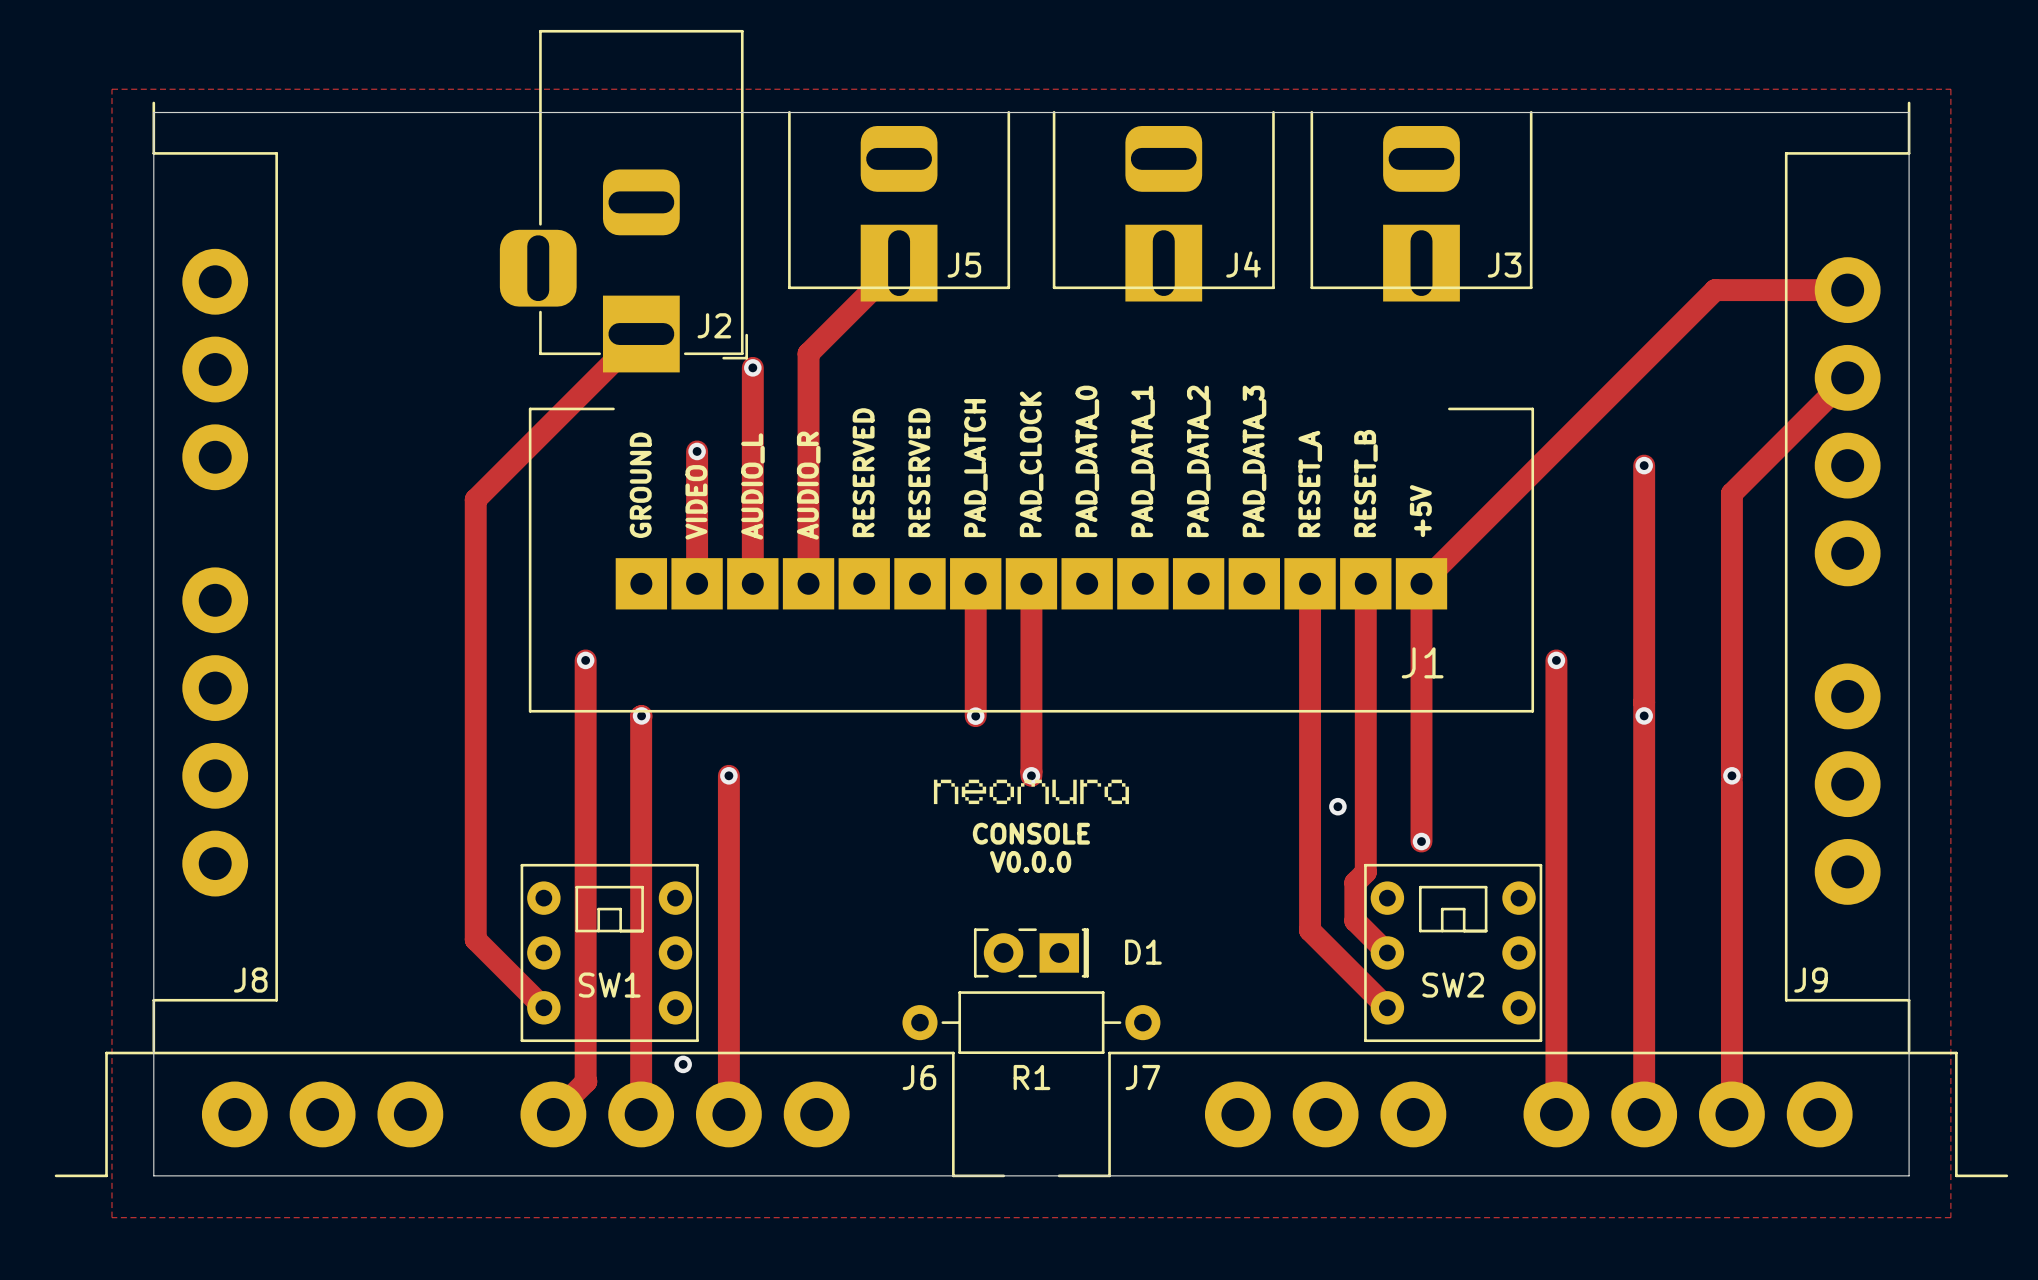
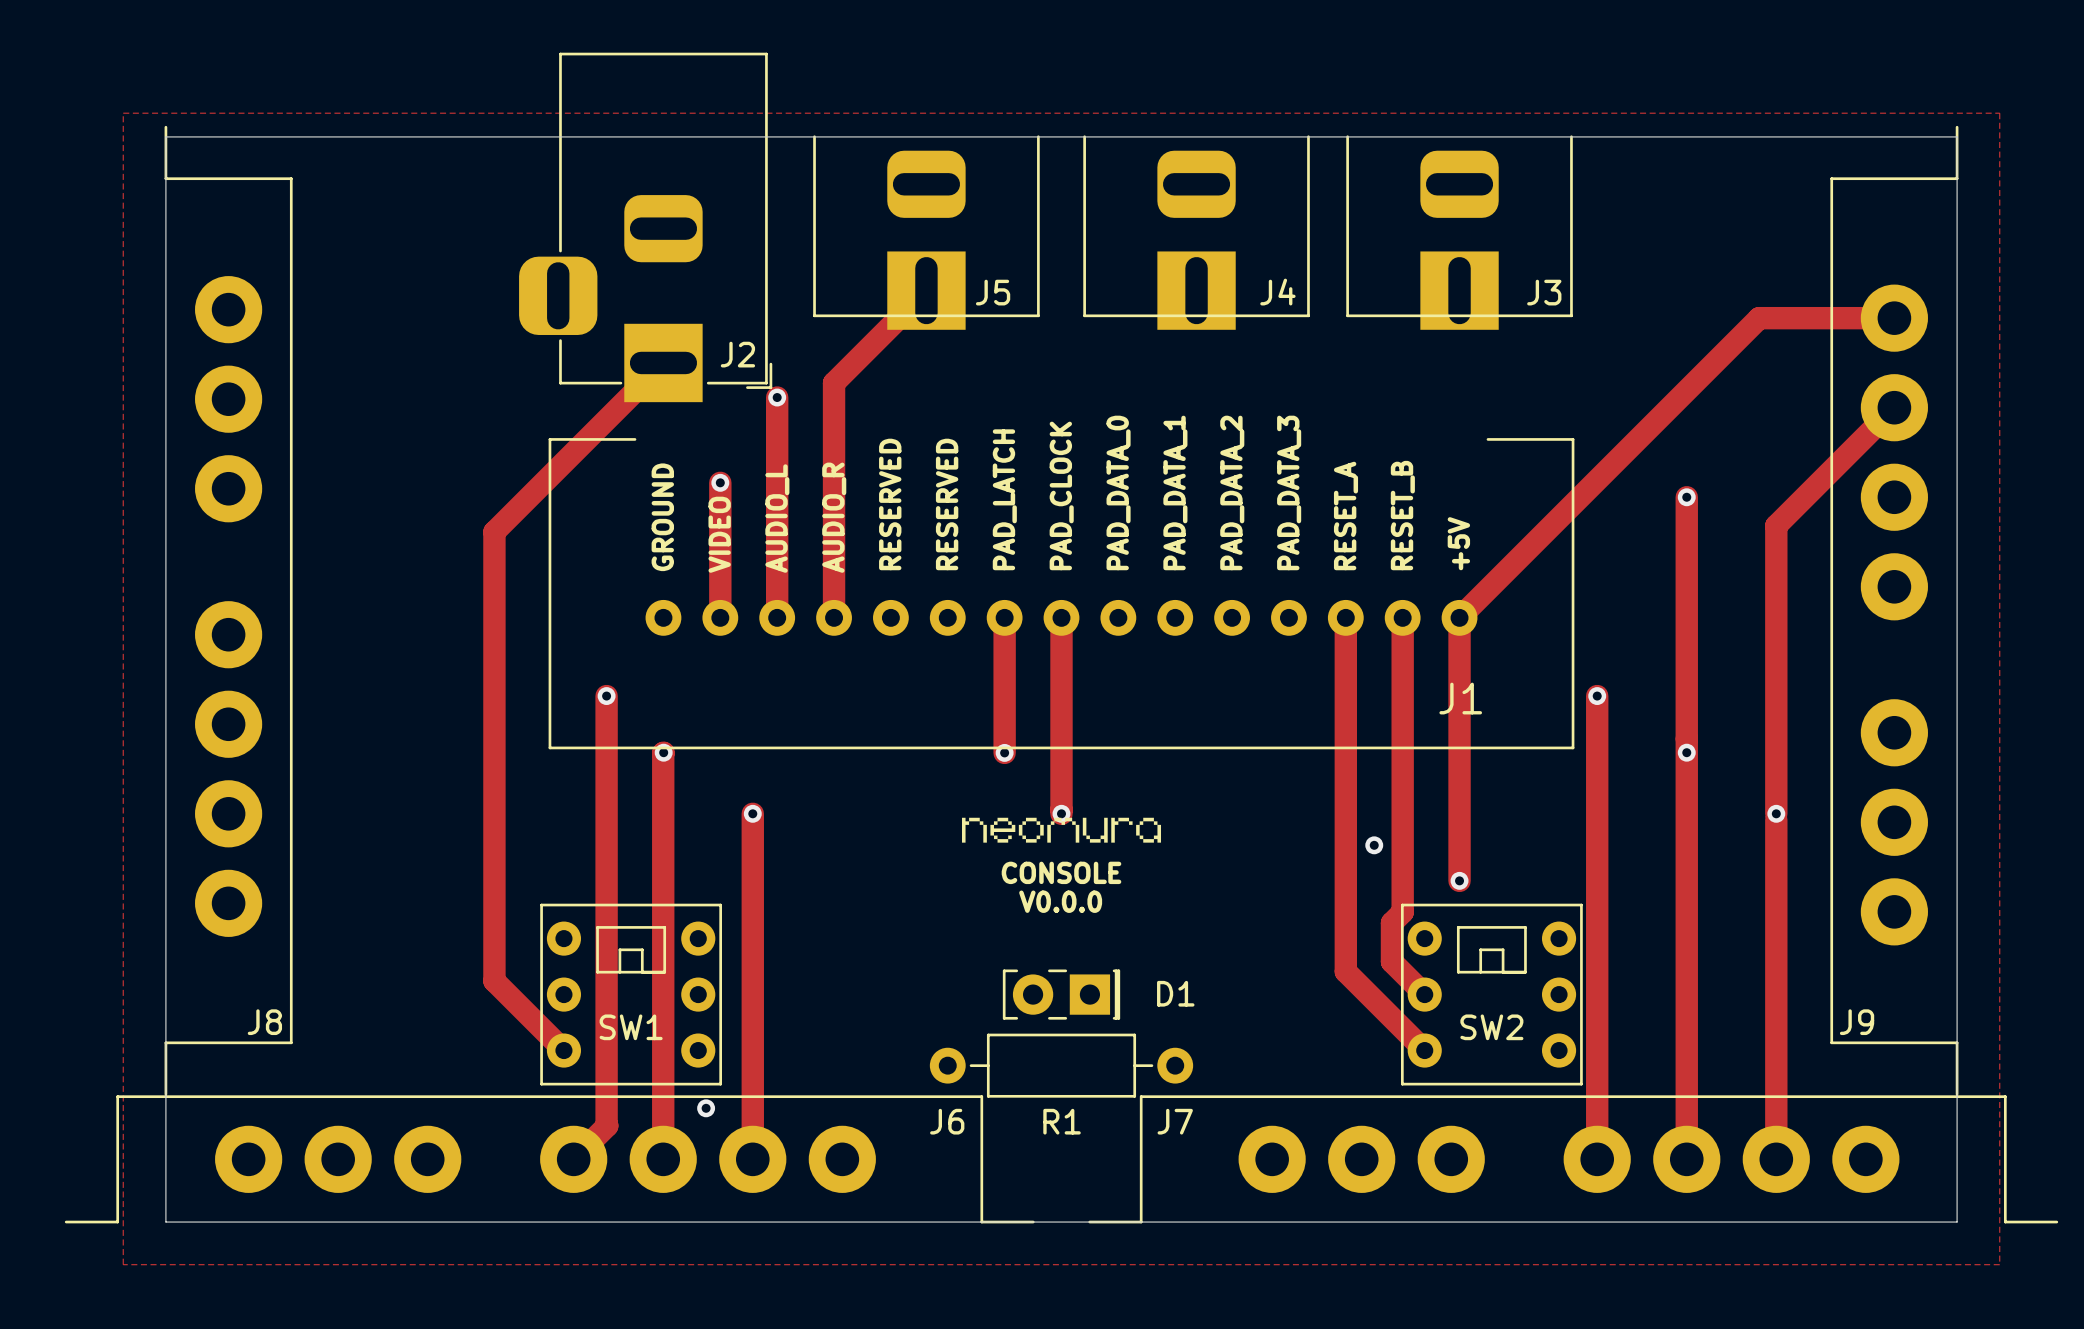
J1 footprint: [528, 407, 1535, 713] -> [548, 438, 1575, 750]

